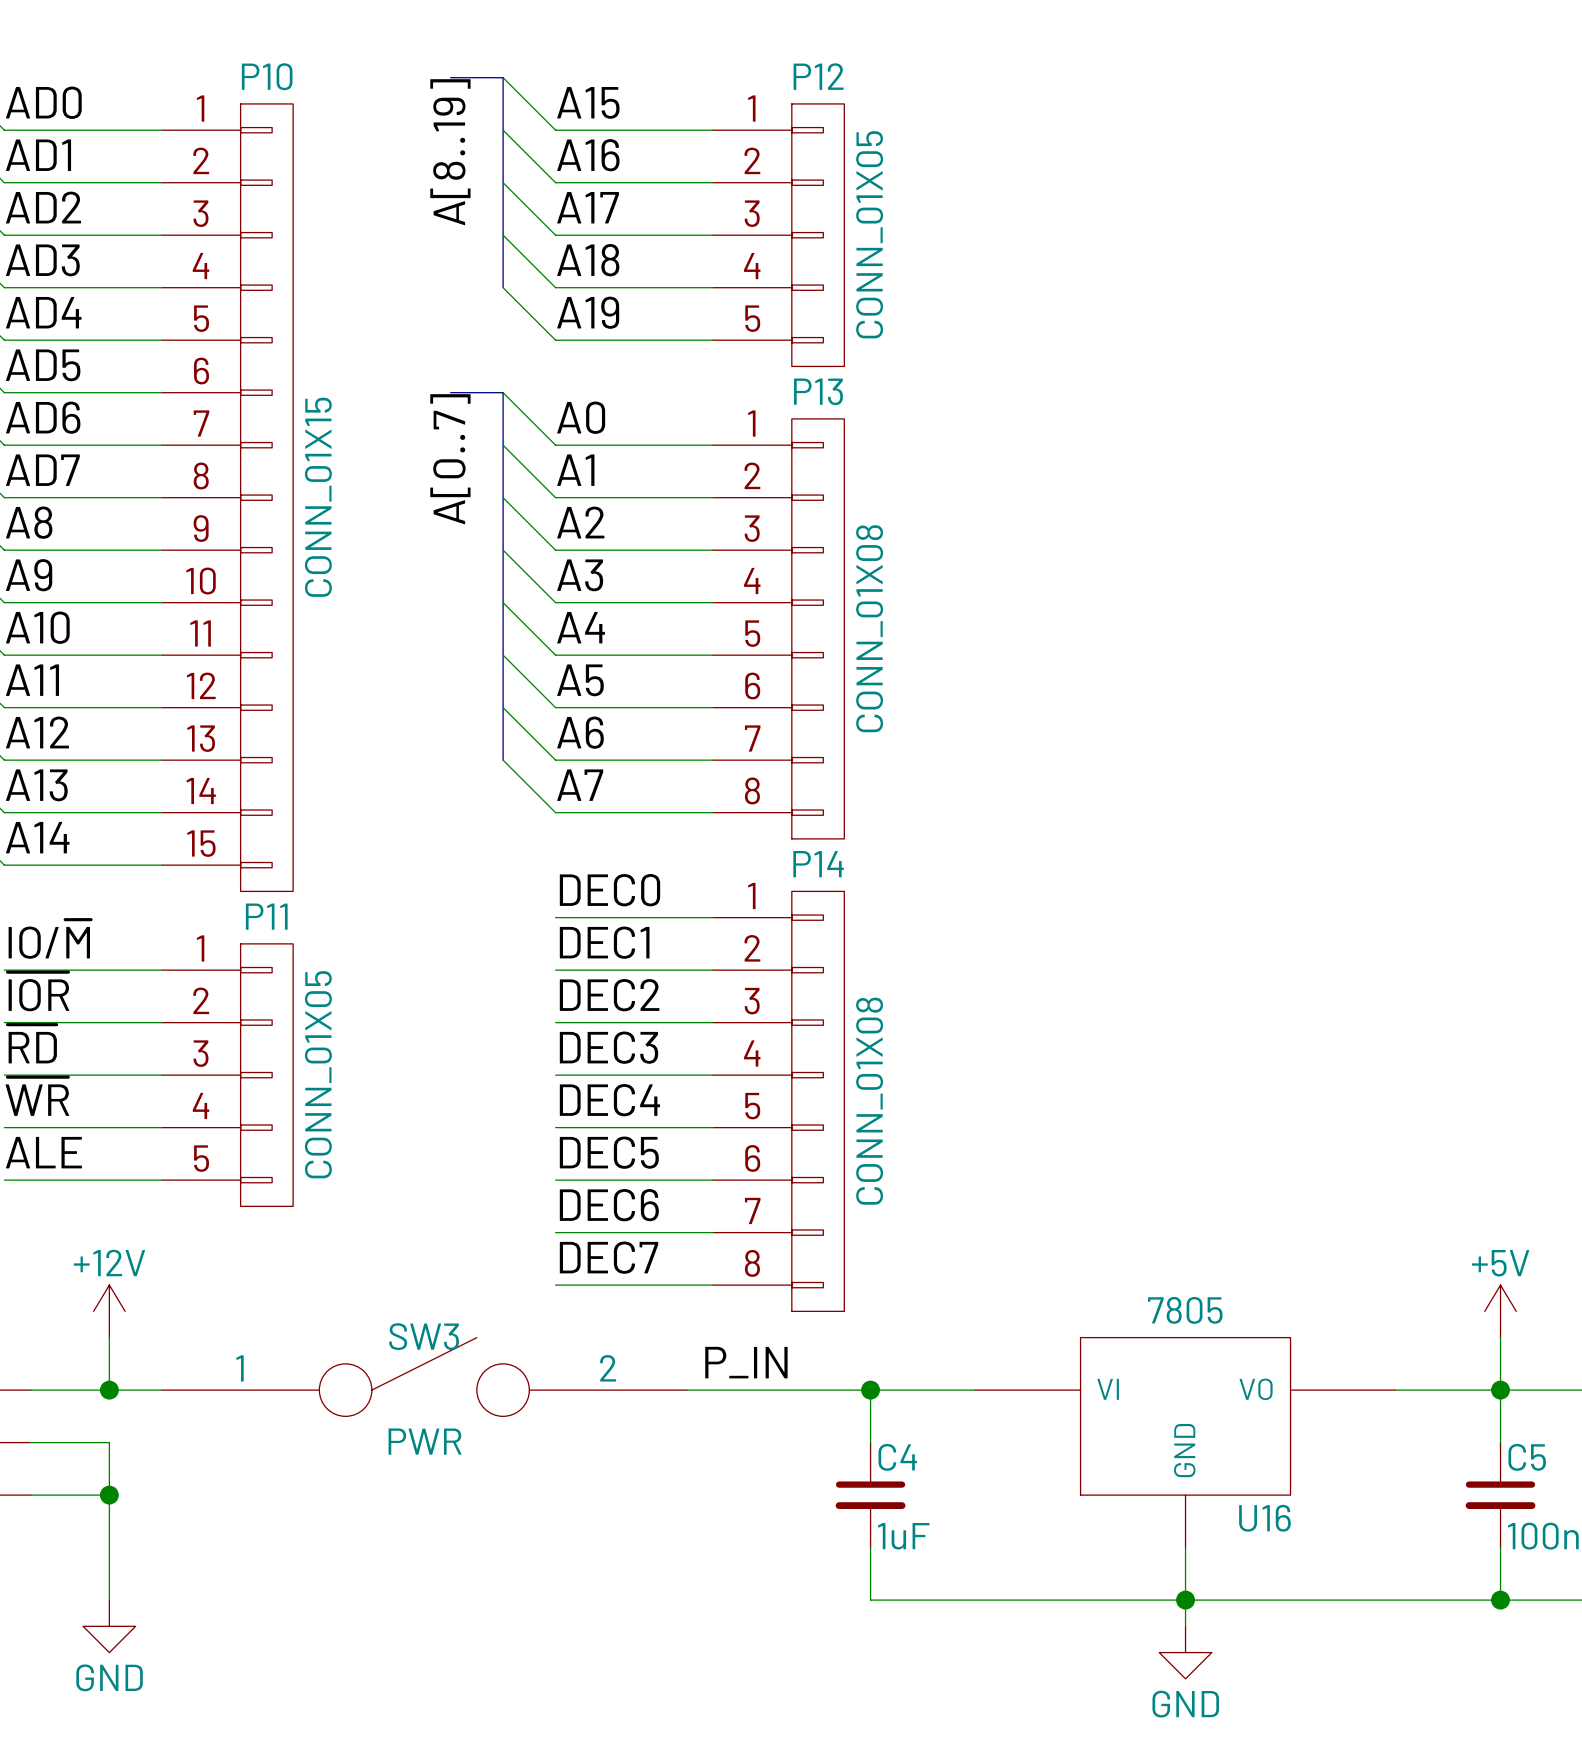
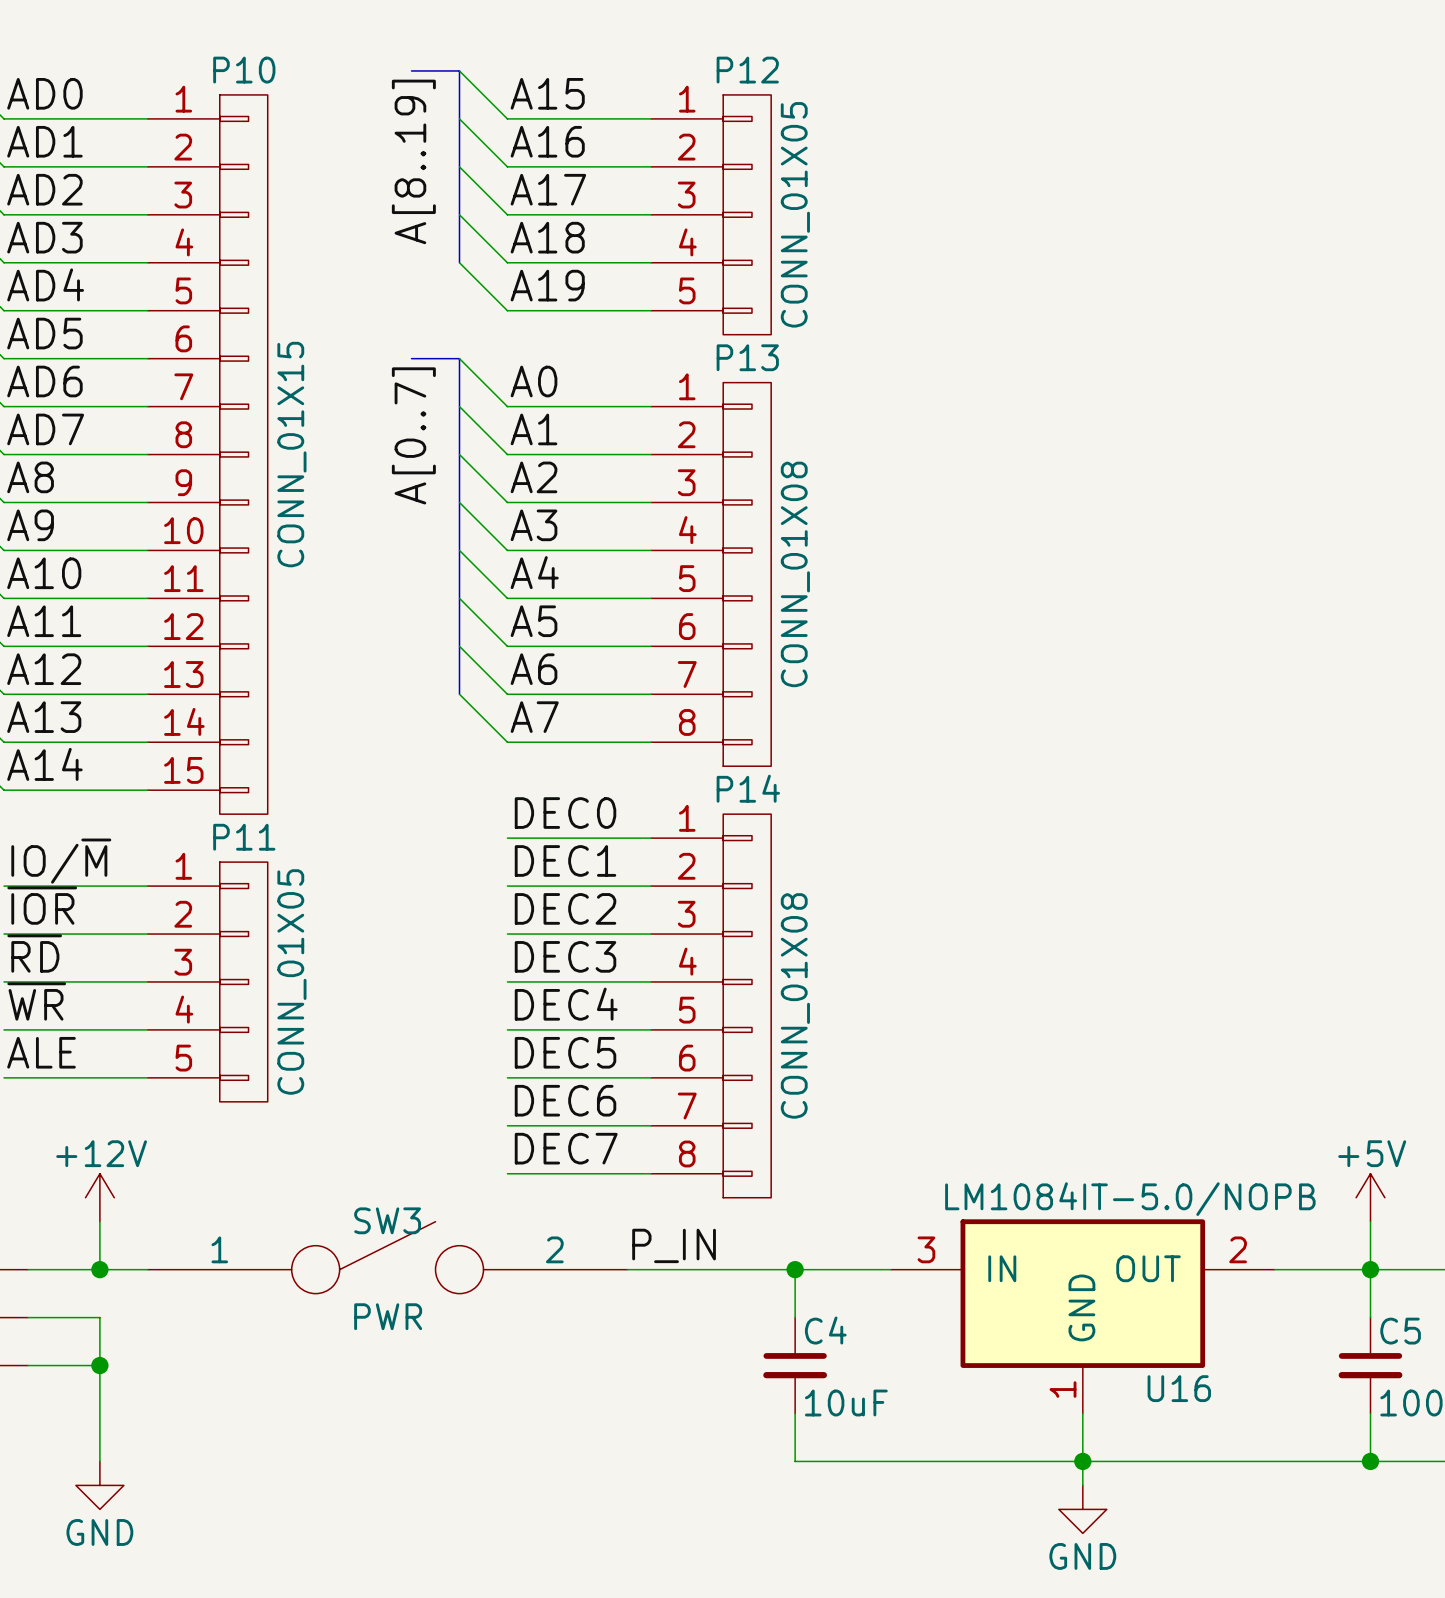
U16 value: 7805 (1185, 1310) -> LM1084IT-5.0/NOPB (1130, 1199)
U16 symbol: [975, 1337, 1396, 1548] -> [891, 1219, 1275, 1414]
C4 value: 1uF (903, 1536) -> 10uF (846, 1403)

